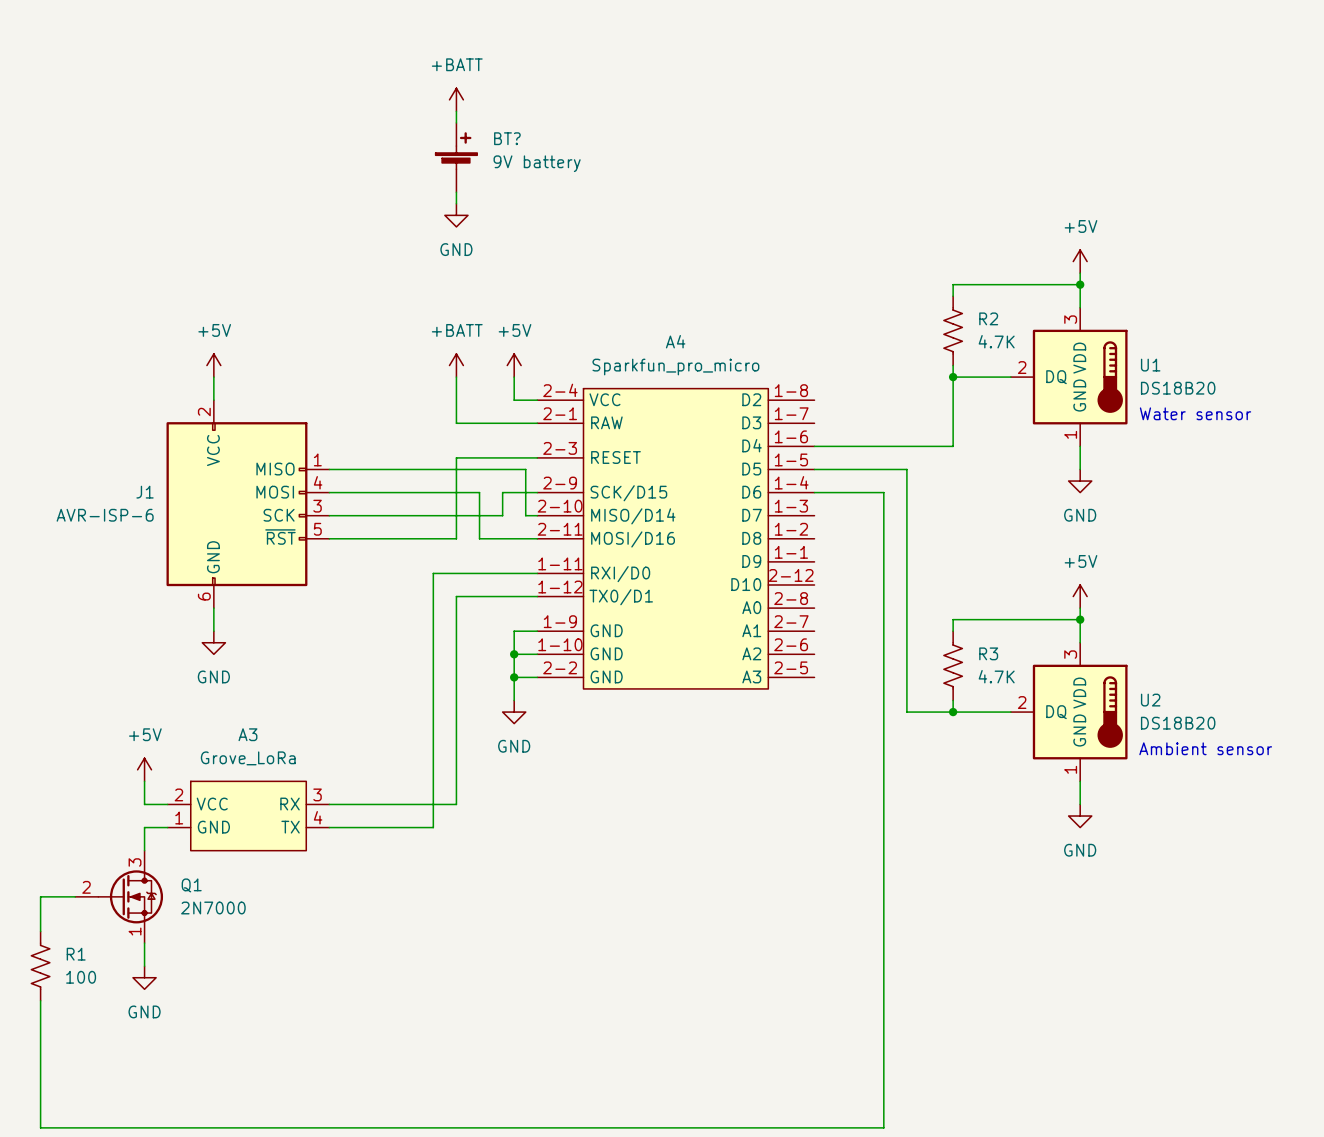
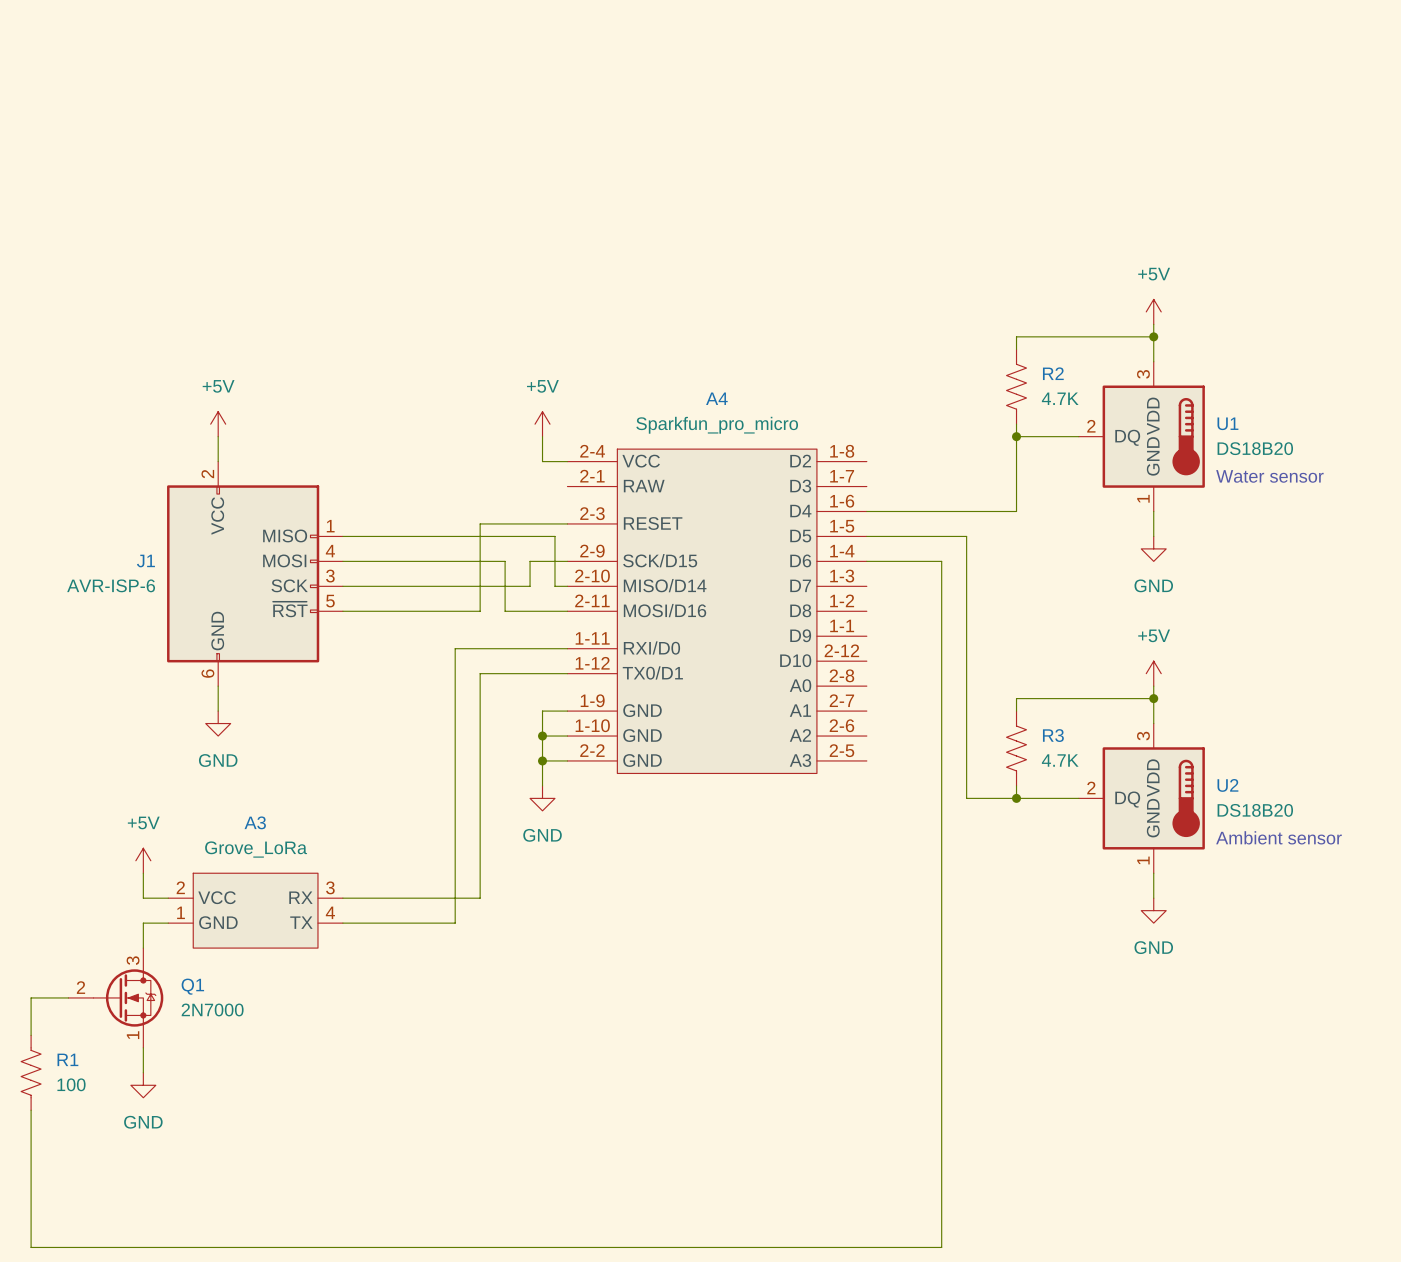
power symbol: +BATT (456, 99) -> none
wire: (456, 111) (456, 122) -> none
BT?: 9V battery (456, 157) -> none
wire: (456, 192) (456, 203) -> none
power symbol: GND (456, 215) -> none
power symbol: +BATT (456, 365) -> none
wire: (456, 377) (456, 423) (537, 423) -> none

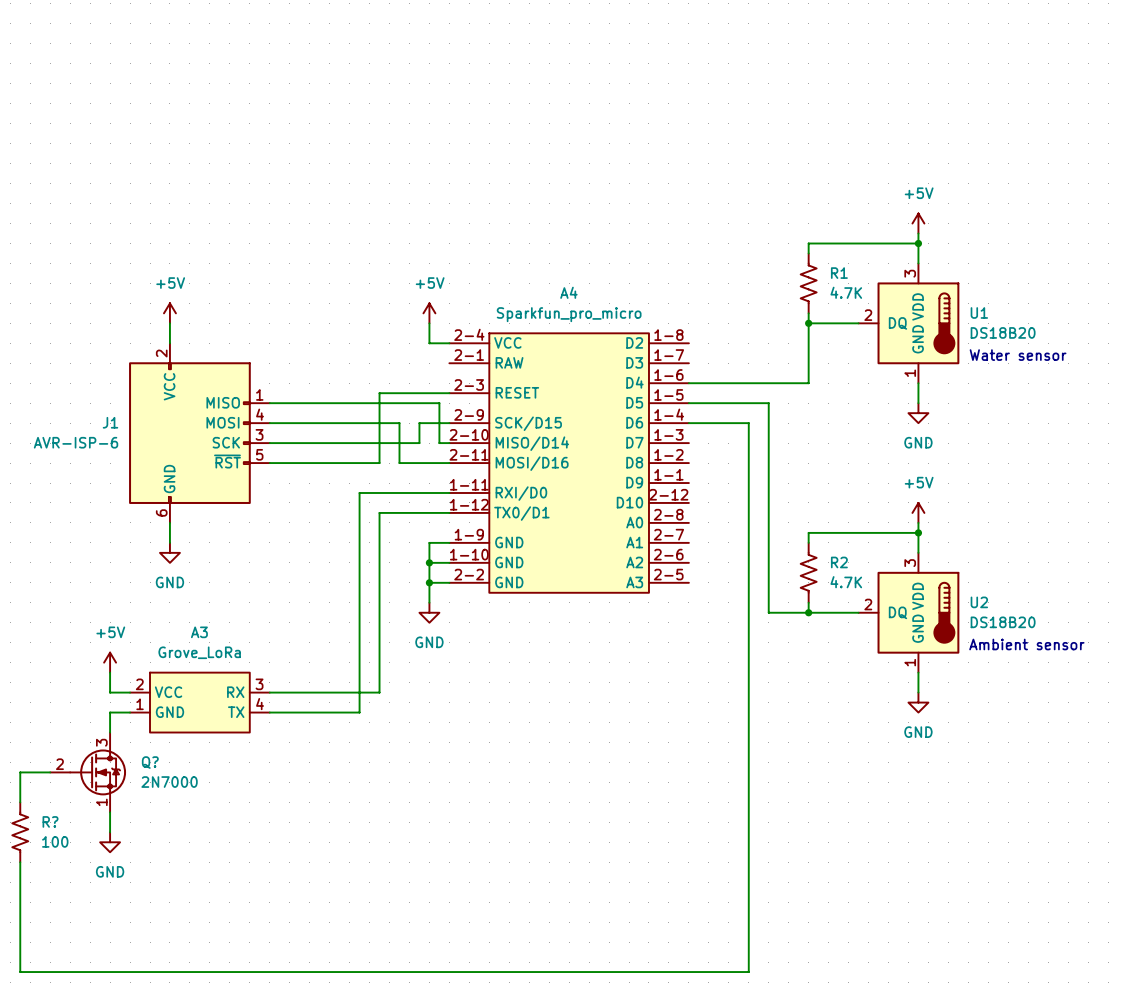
R2 name: R2 (1053, 373) -> R1 (839, 273)
R3 name: R3 (1053, 735) -> R2 (839, 562)
Q1 name: Q1 (192, 986) -> Q? (150, 762)
R1 name: R1 (67, 1059) -> R? (50, 821)

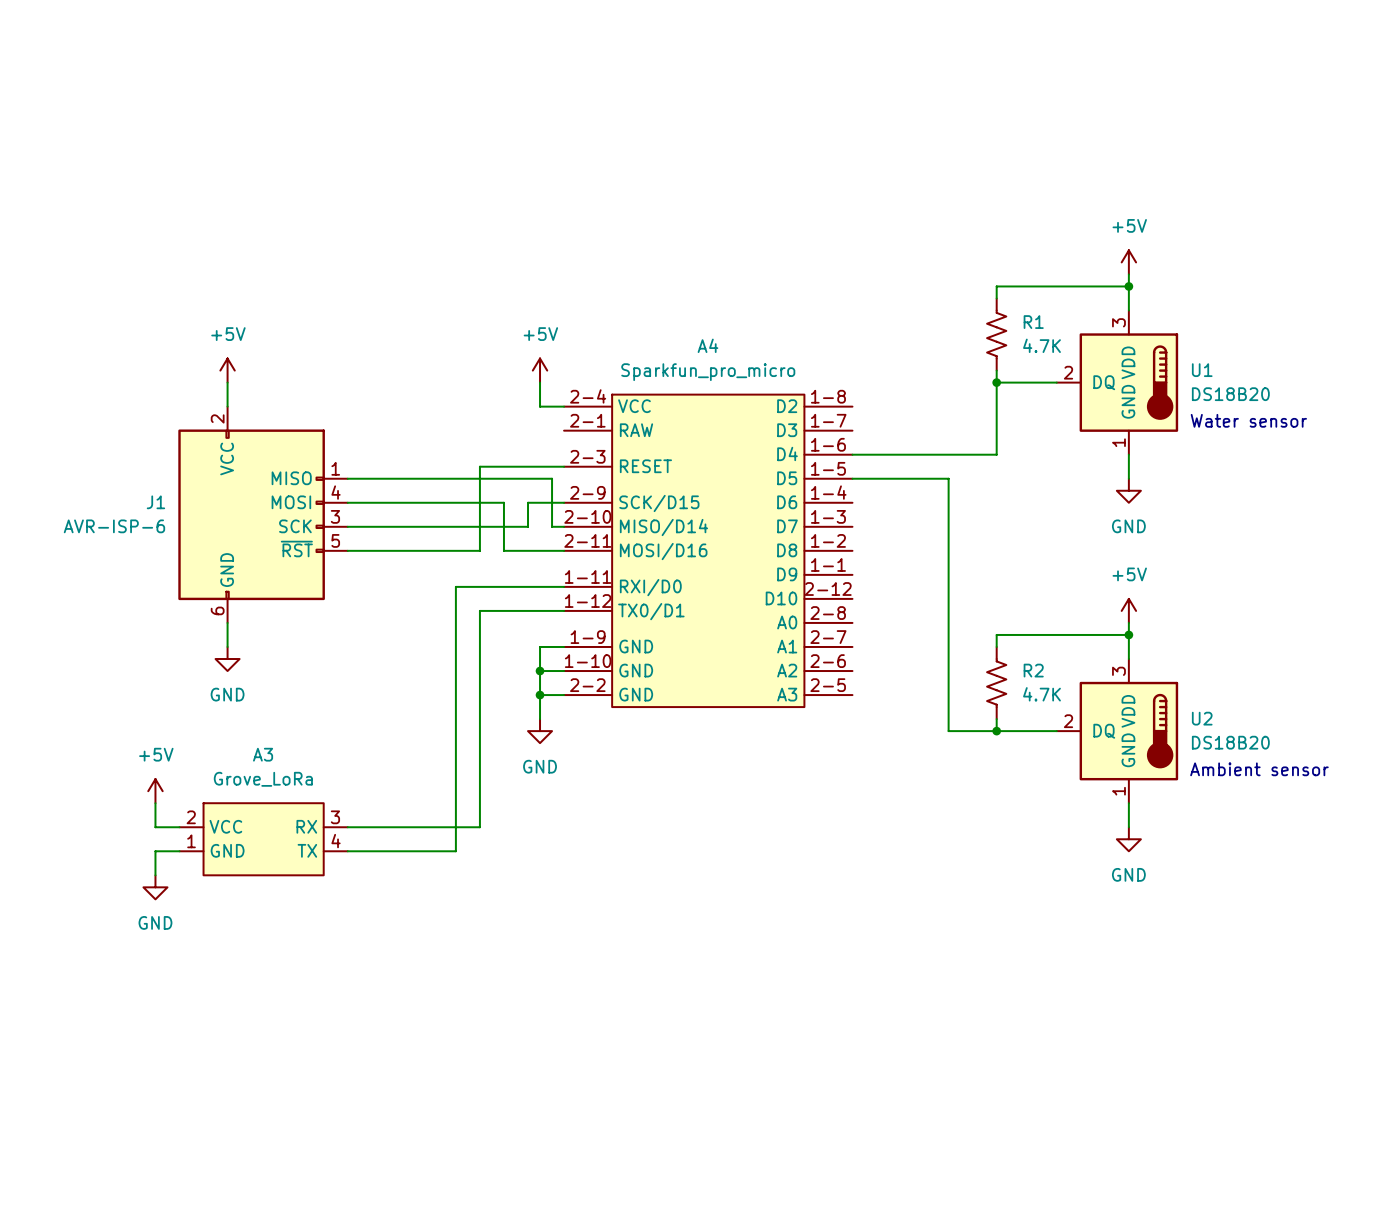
wire: (688, 423) (748, 423) (748, 972) (20, 972) (20, 862) -> none
wire: (50, 772) (20, 772) (20, 802) -> none
Q?: 2N7000 (88, 772) -> none
wire: (110, 812) (110, 832) -> none
R?: 100 (20, 832) -> none
power symbol position: GND (110, 842) -> GND (155, 887)

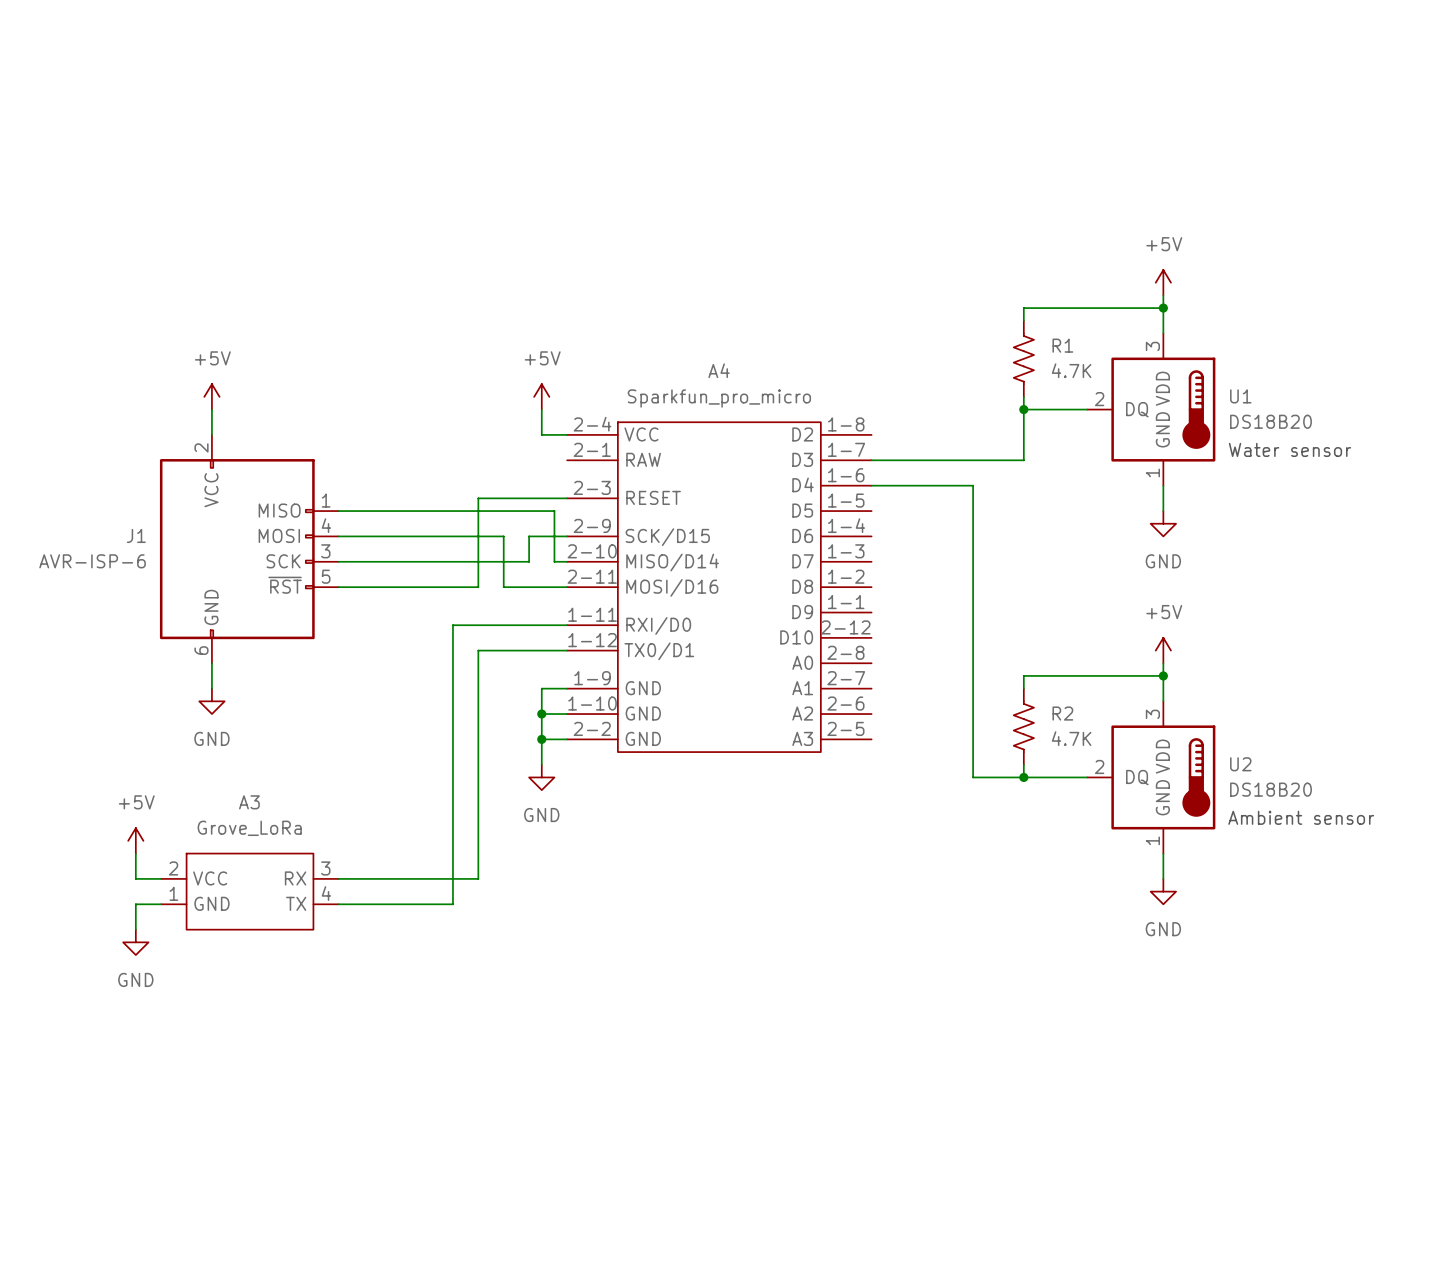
wire: none -> (871, 460) (1023, 460)
wire: (996, 430) (996, 454) (948, 454) -> (973, 511) (973, 485)
wire: (852, 478) (948, 478) -> none

